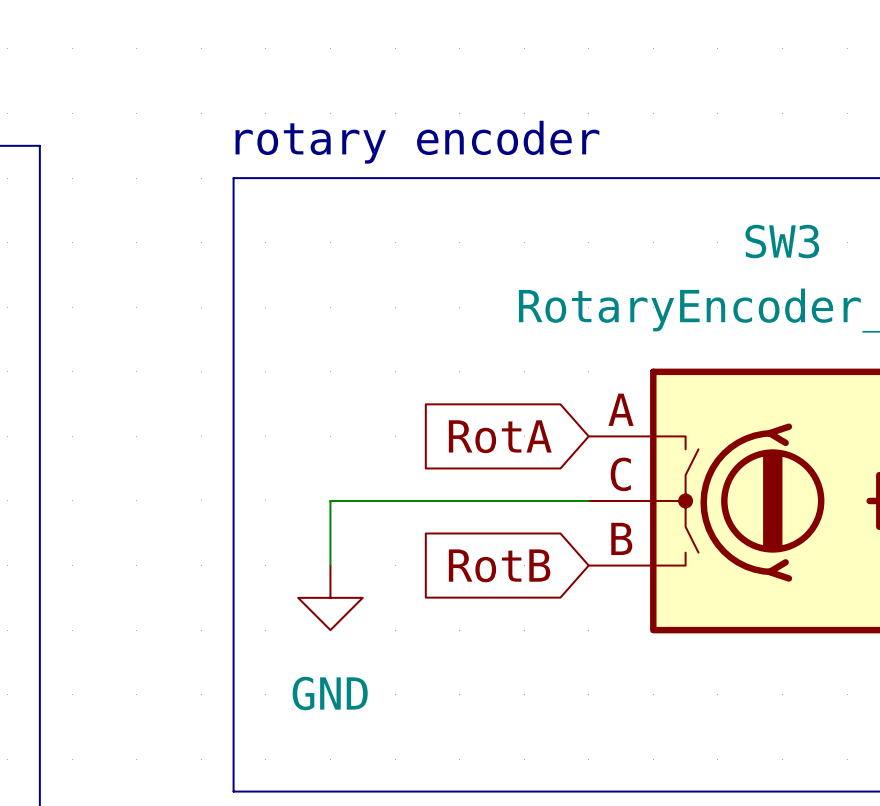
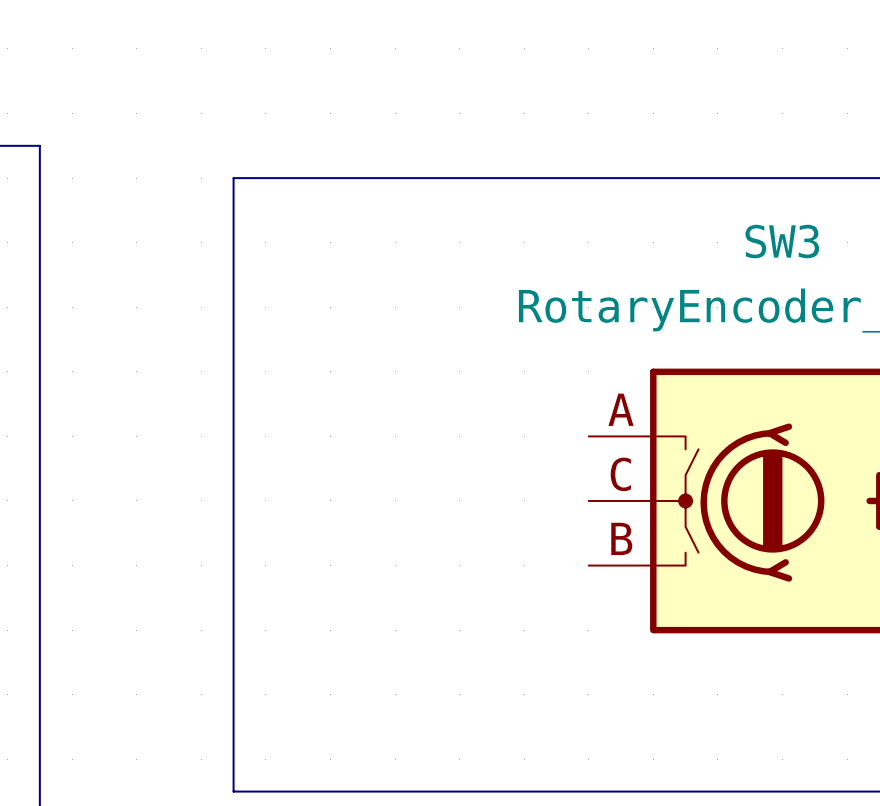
text: rotary encoder (417, 142) -> none
global label: RotA (500, 436) -> none
wire: (588, 500) (330, 500) (330, 565) -> none
global label: RotB (499, 565) -> none
power symbol: GND (330, 597) -> none

